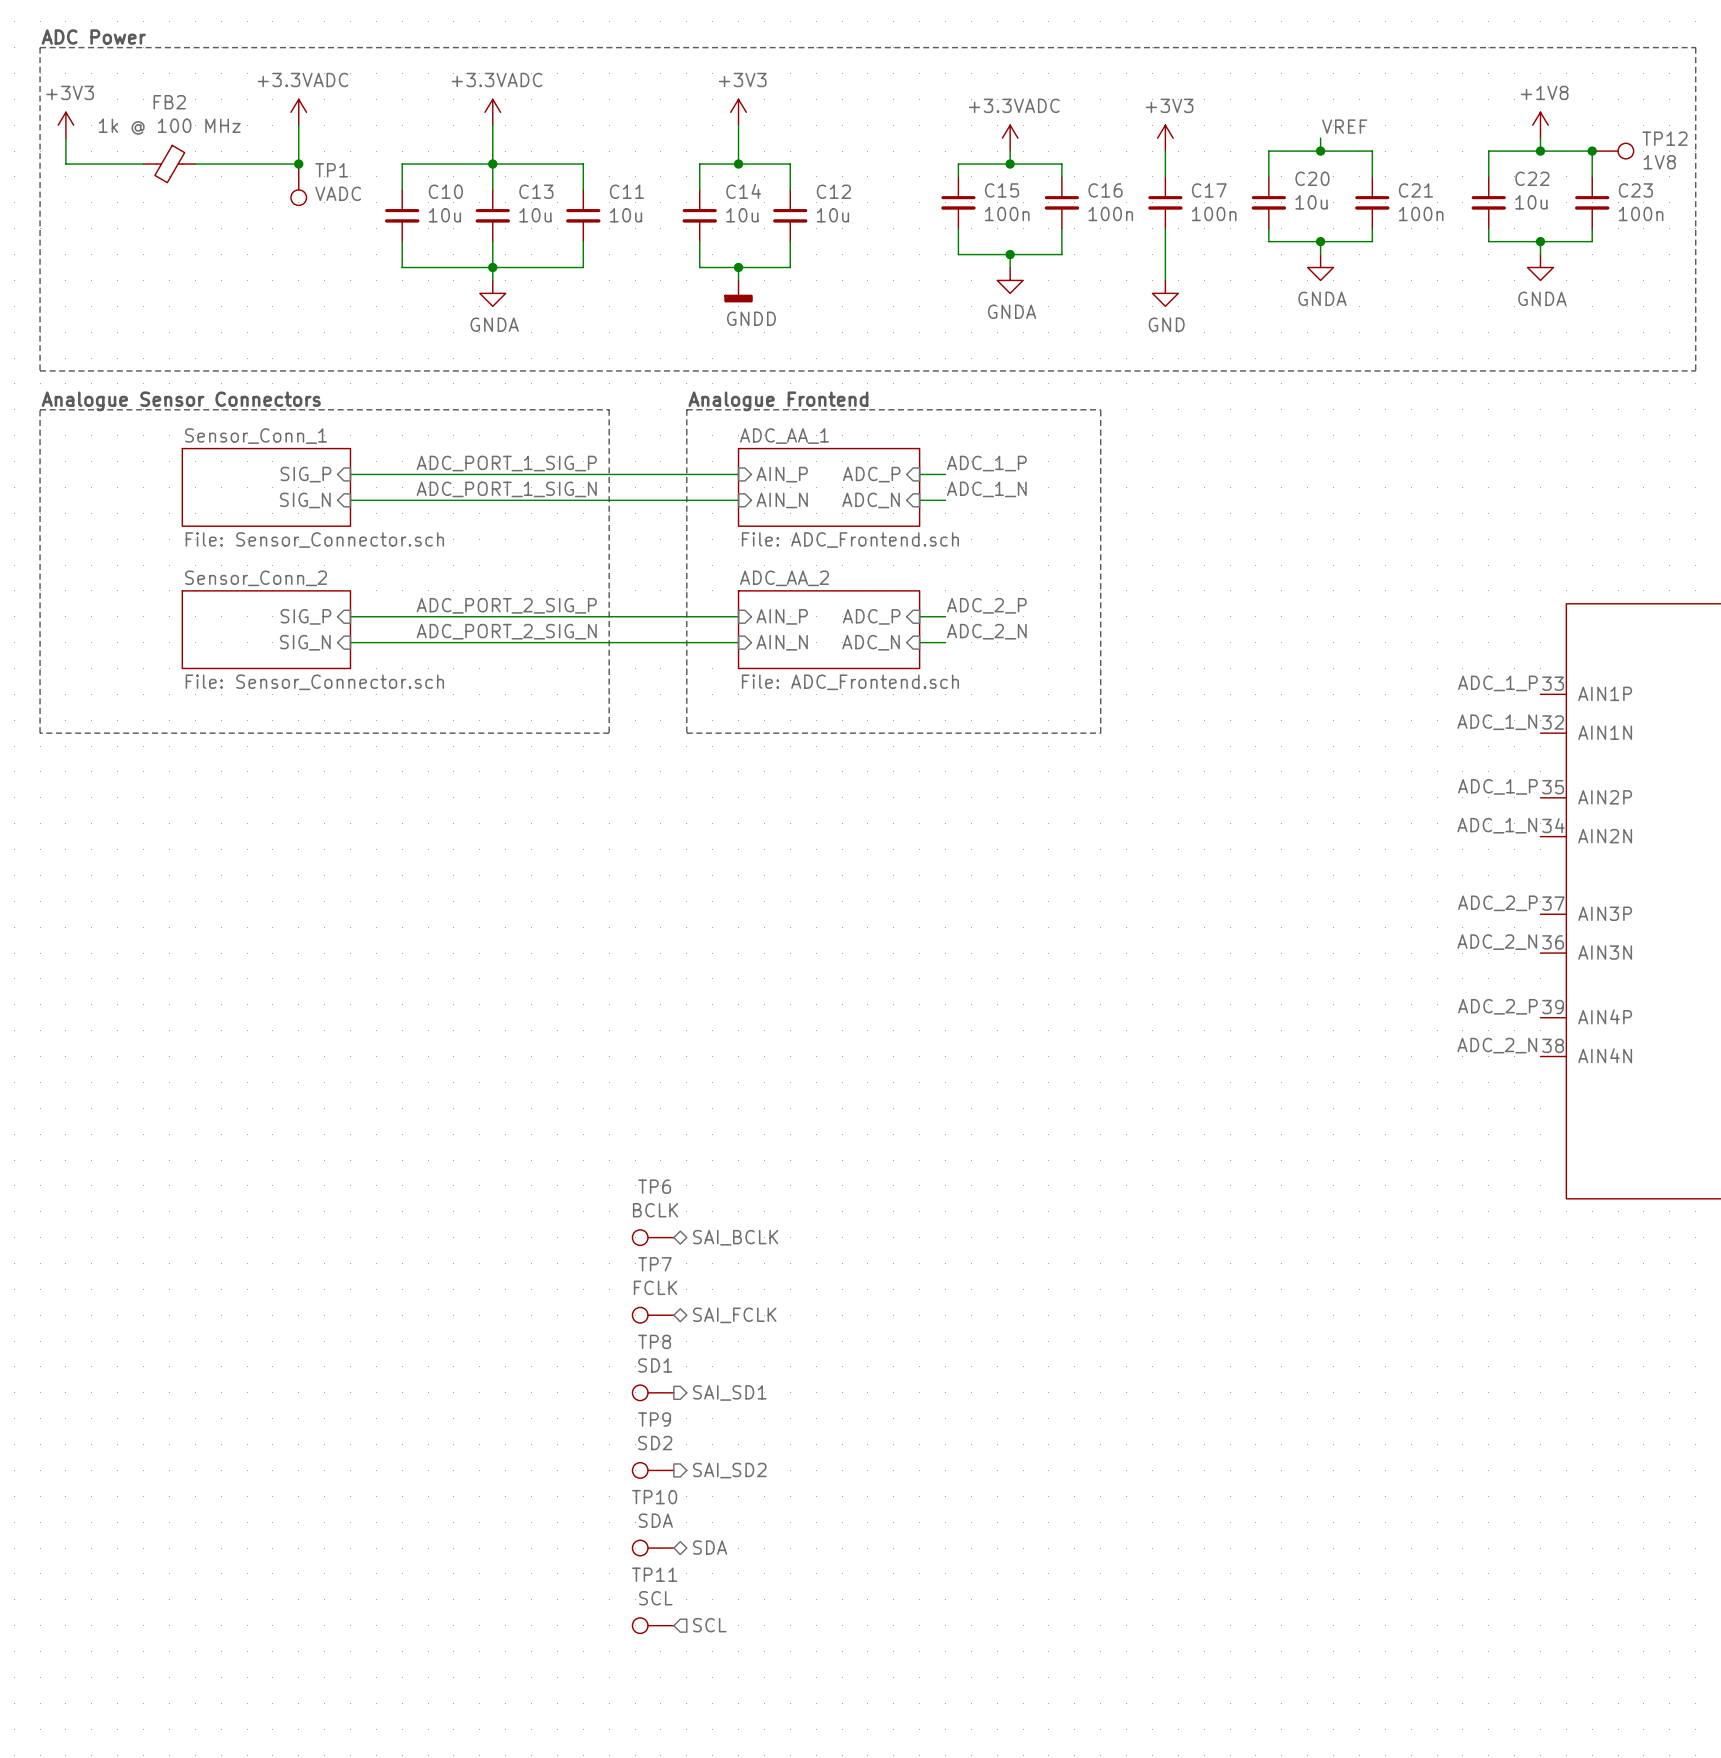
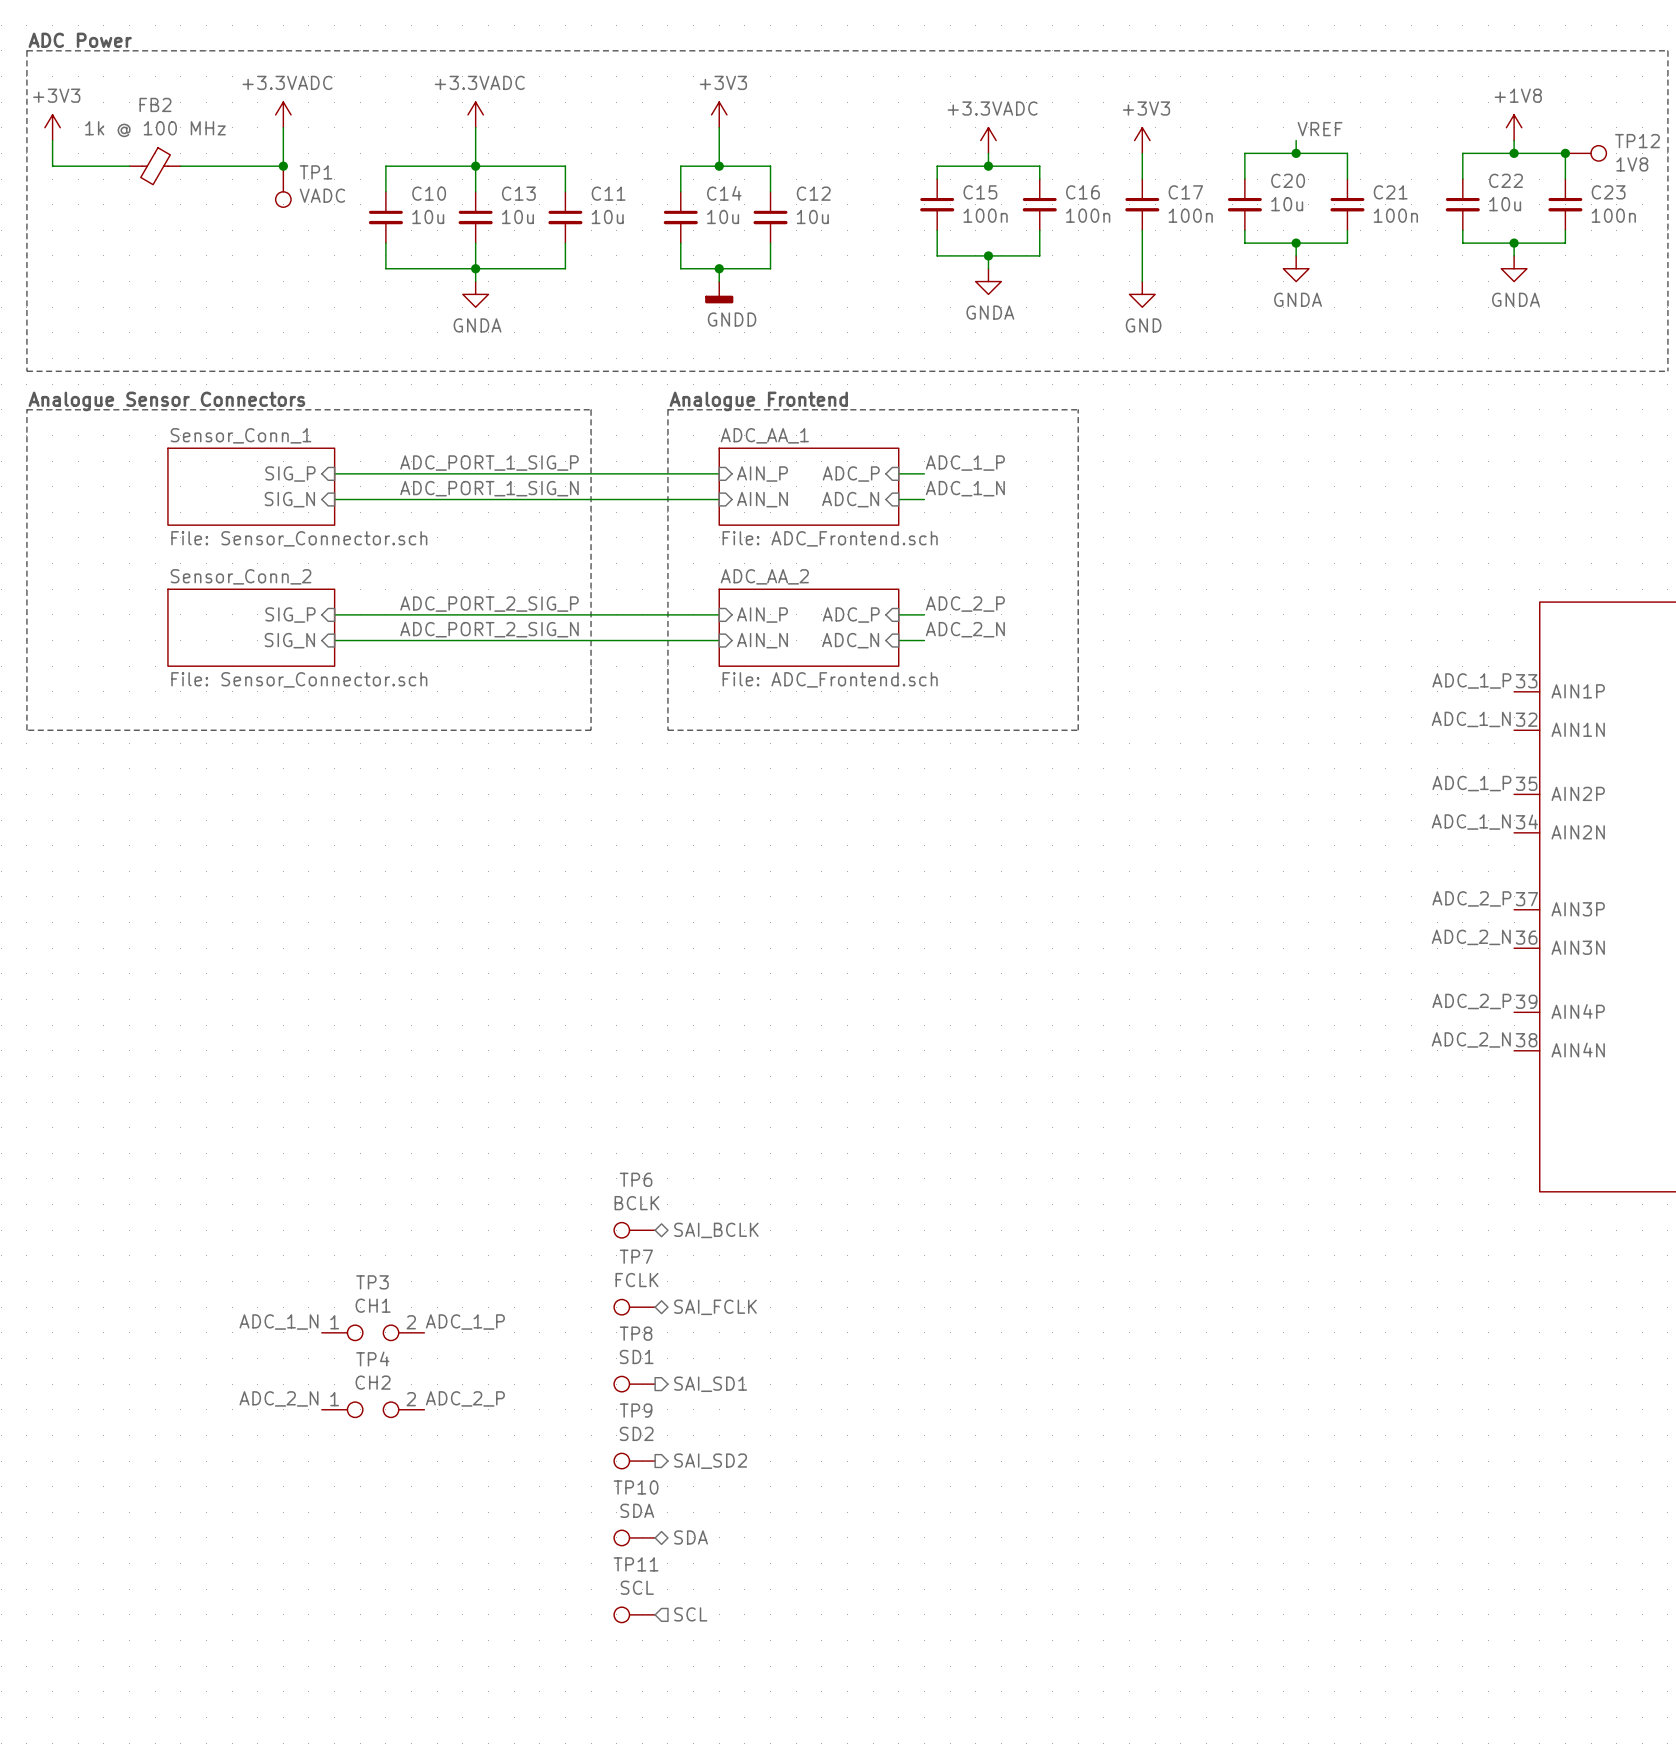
label: none -> ADC_1_N (278, 1322)
label: none -> ADC_1_P (465, 1322)
TP3: none -> CH1 (373, 1332)
label: none -> ADC_2_N (278, 1398)
label: none -> ADC_2_P (465, 1398)
TP4: none -> CH2 (373, 1409)

